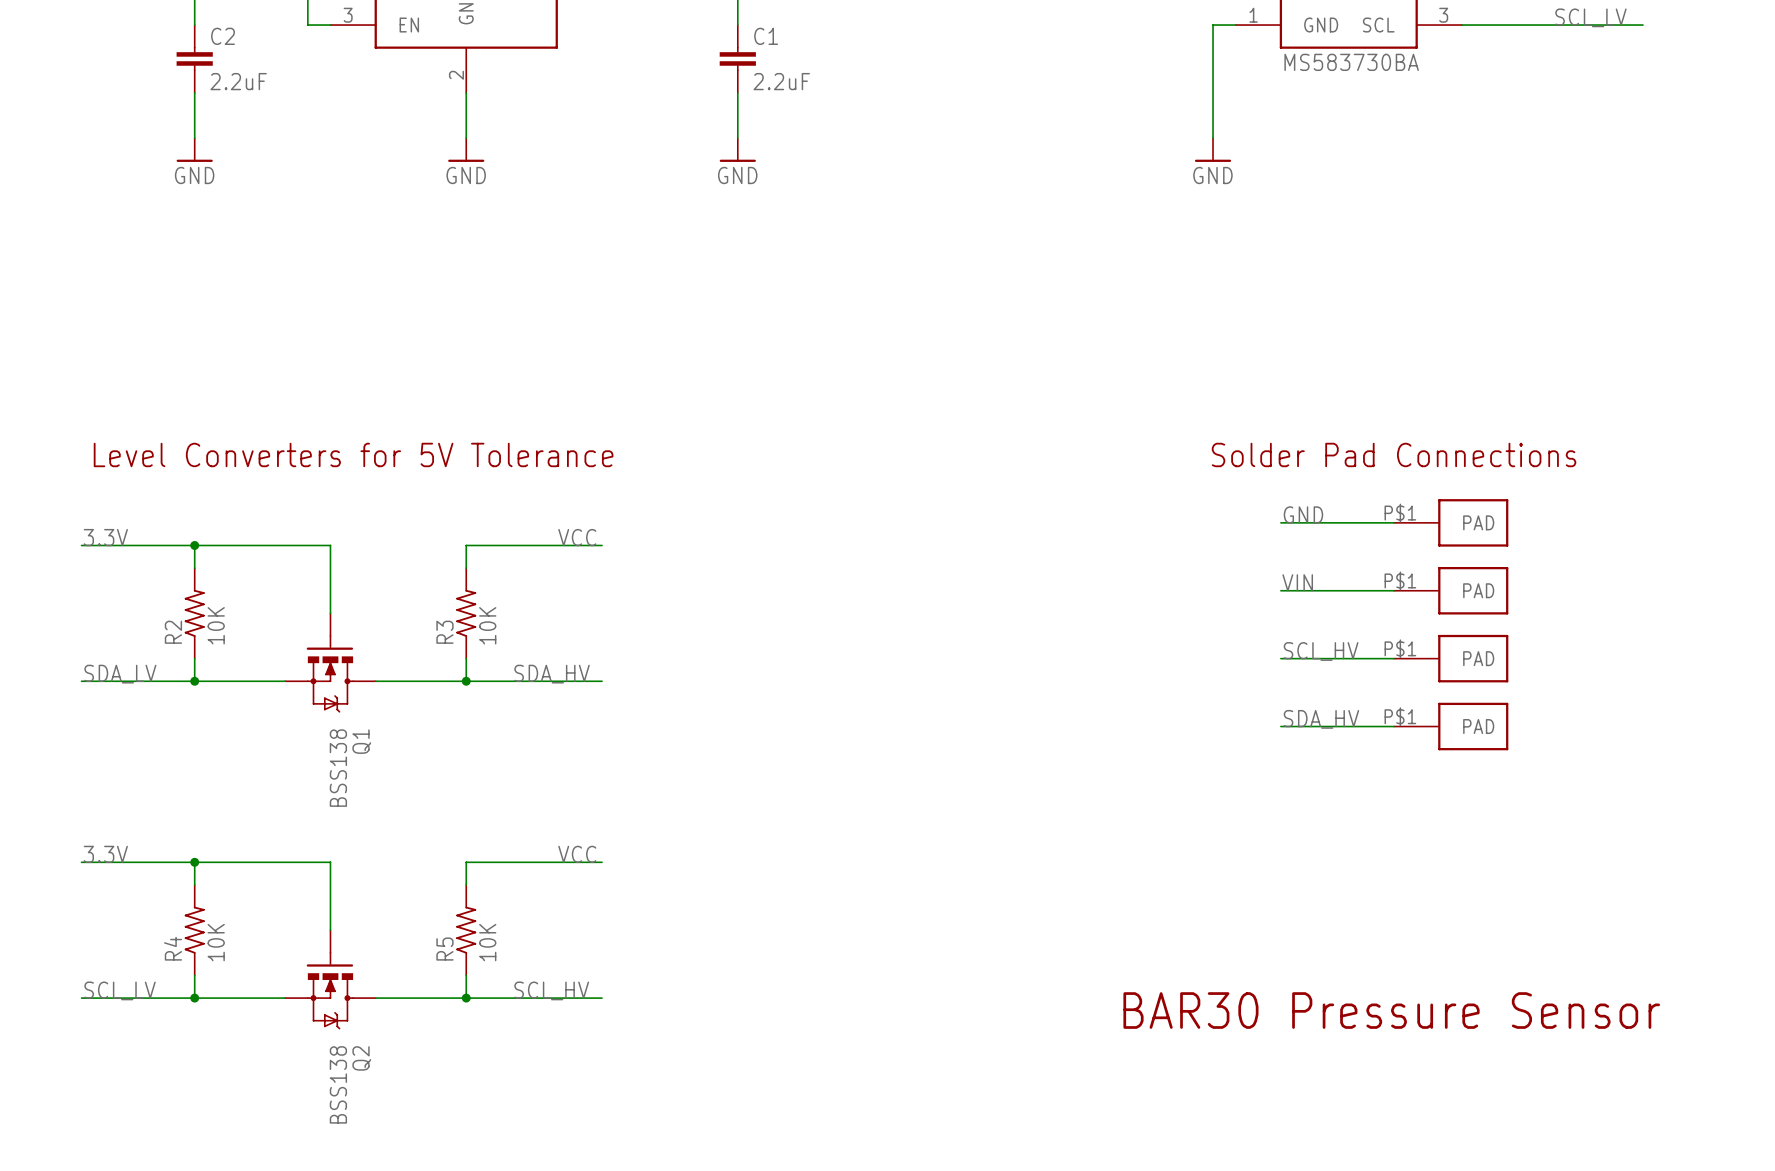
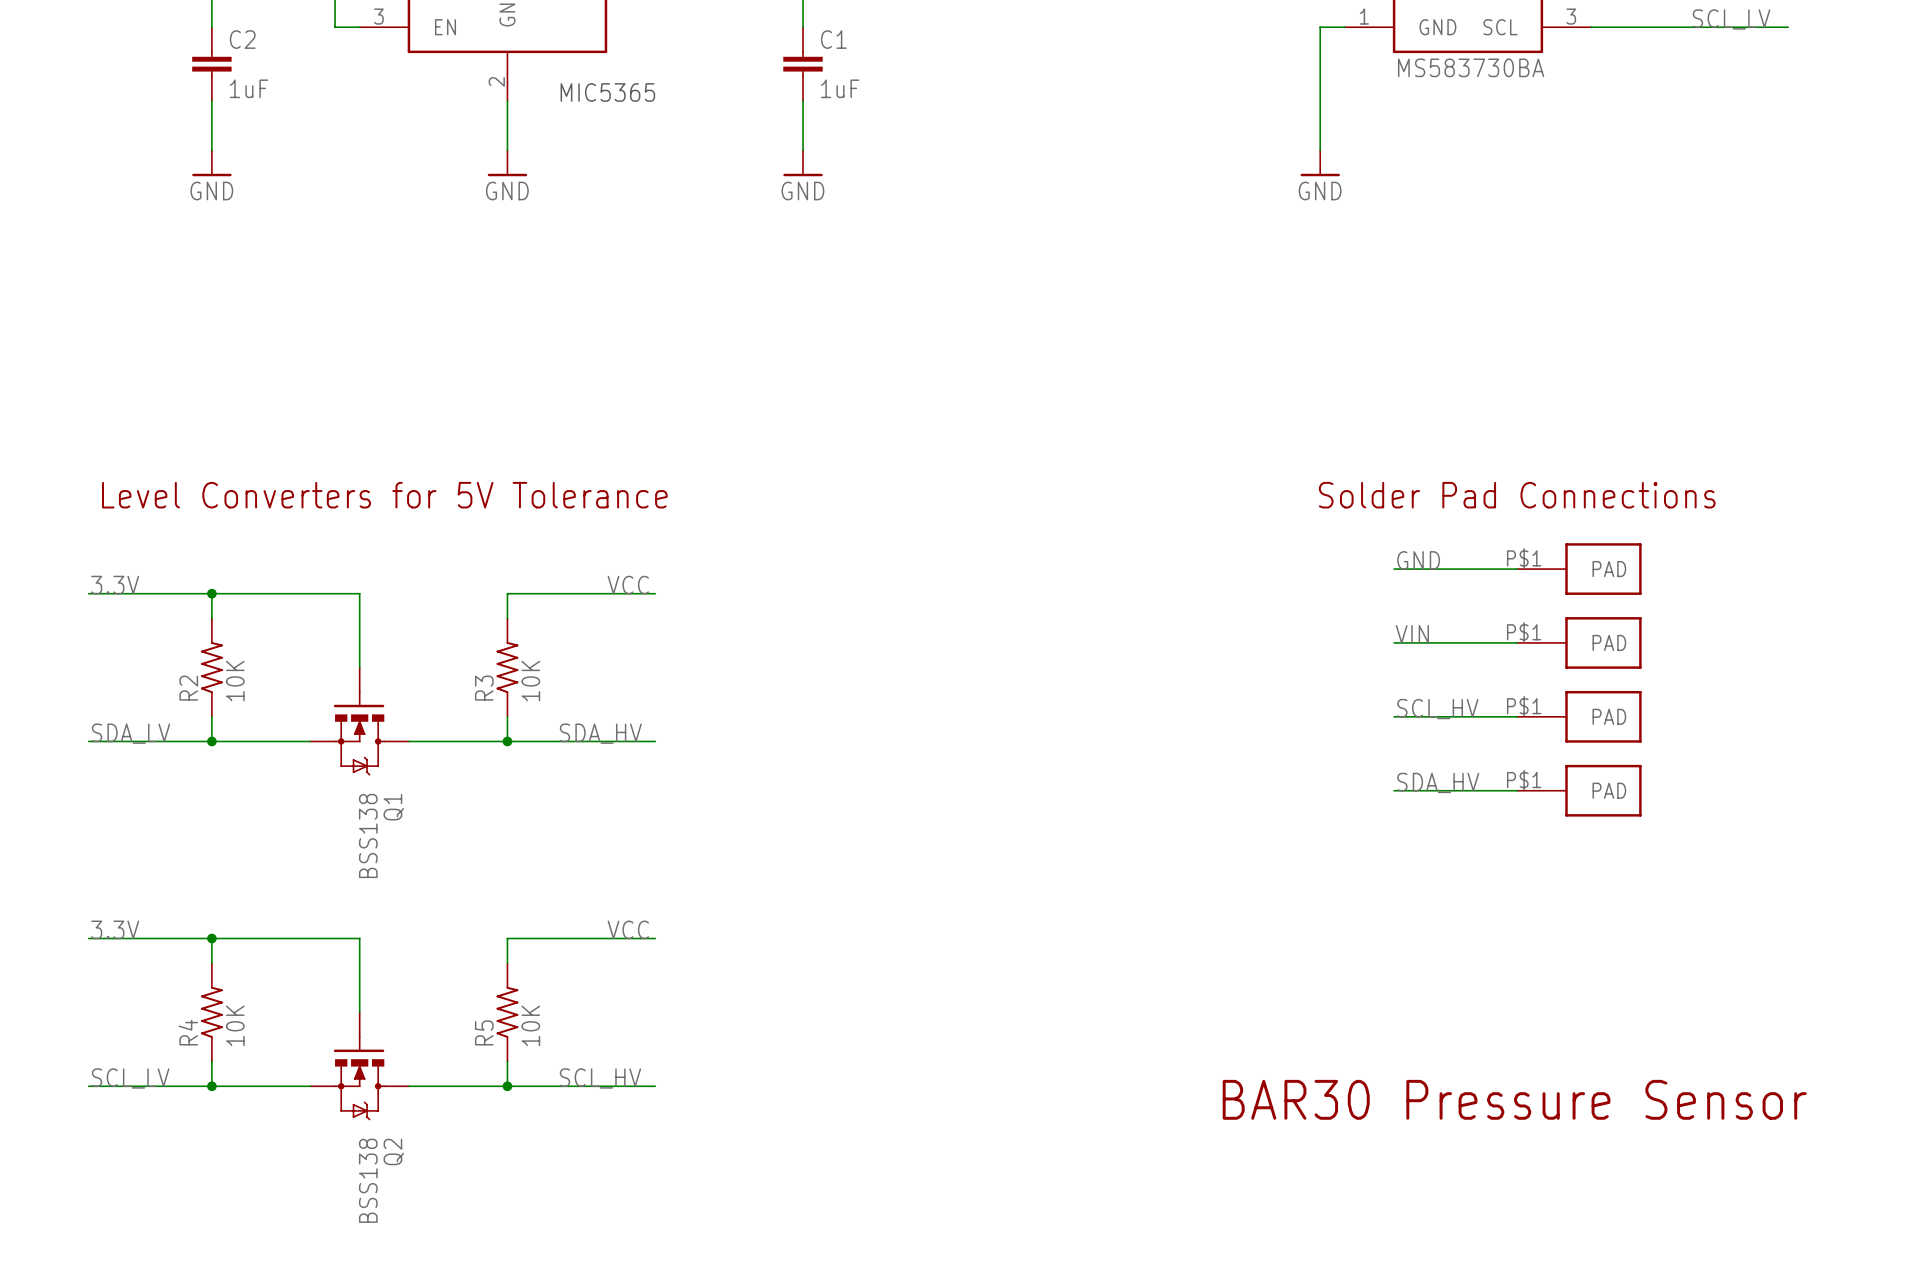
C2 value: 2.2uF (238, 81) -> 1uF (249, 88)
C1 value: 2.2uF (781, 81) -> 1uF (840, 88)
text: none -> MIC5365 (607, 92)

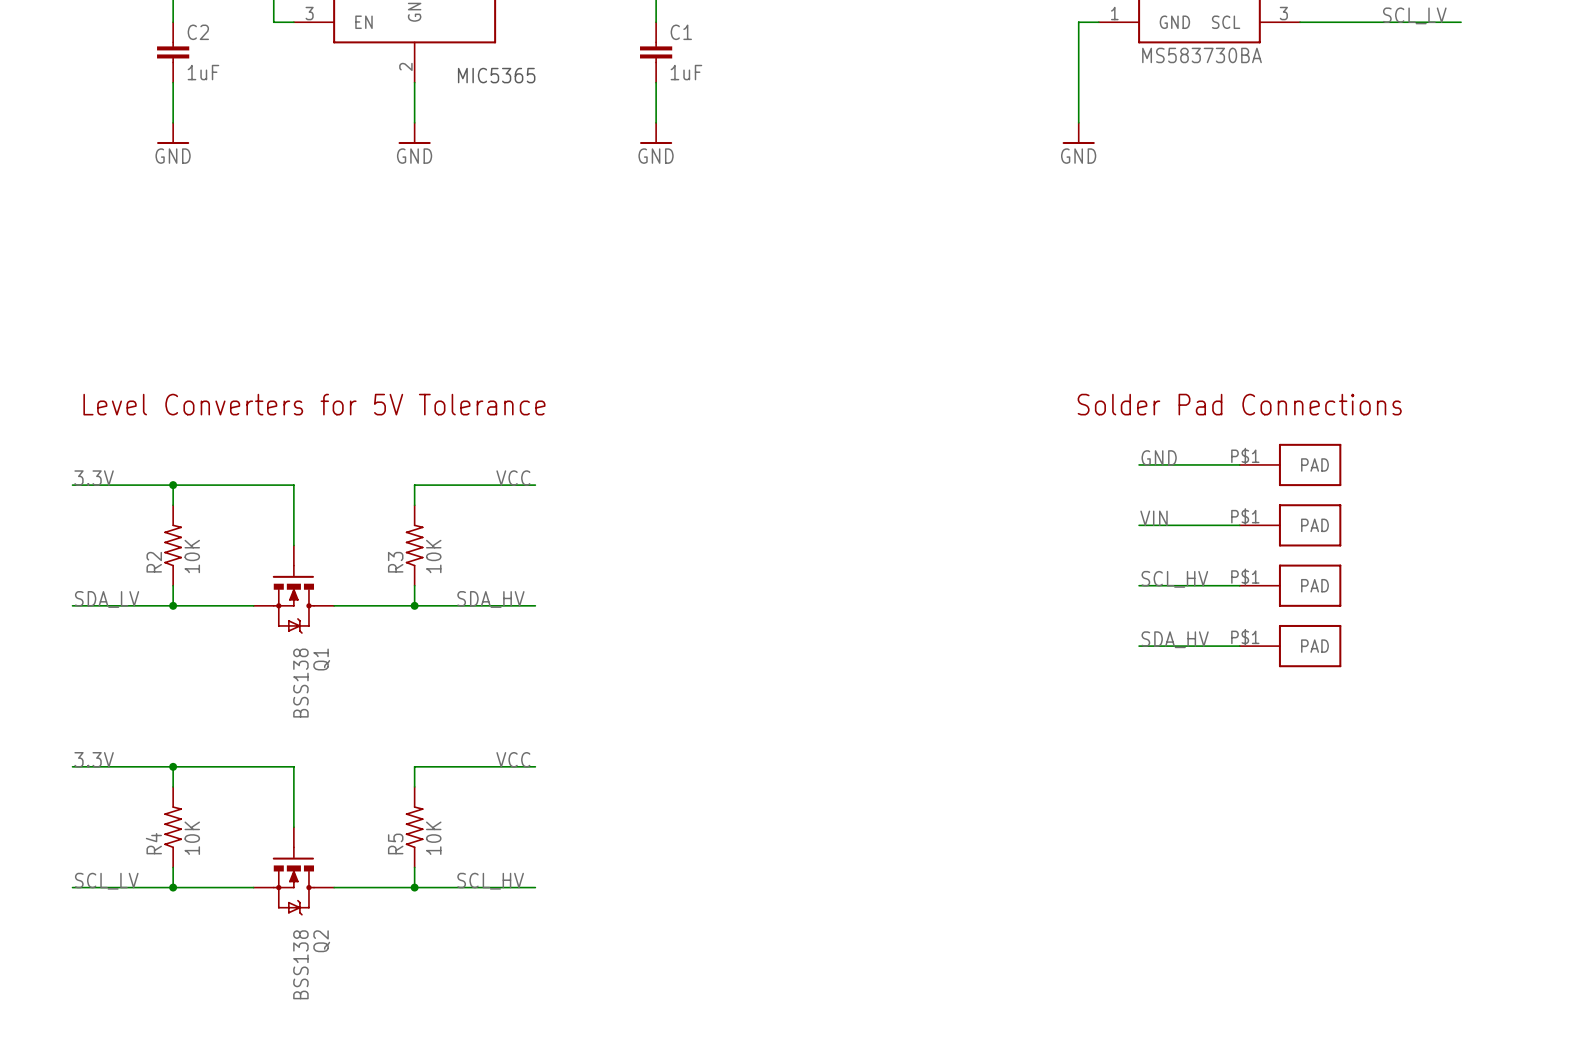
text: BAR30 Pressure Sensor (1514, 1099) -> none

